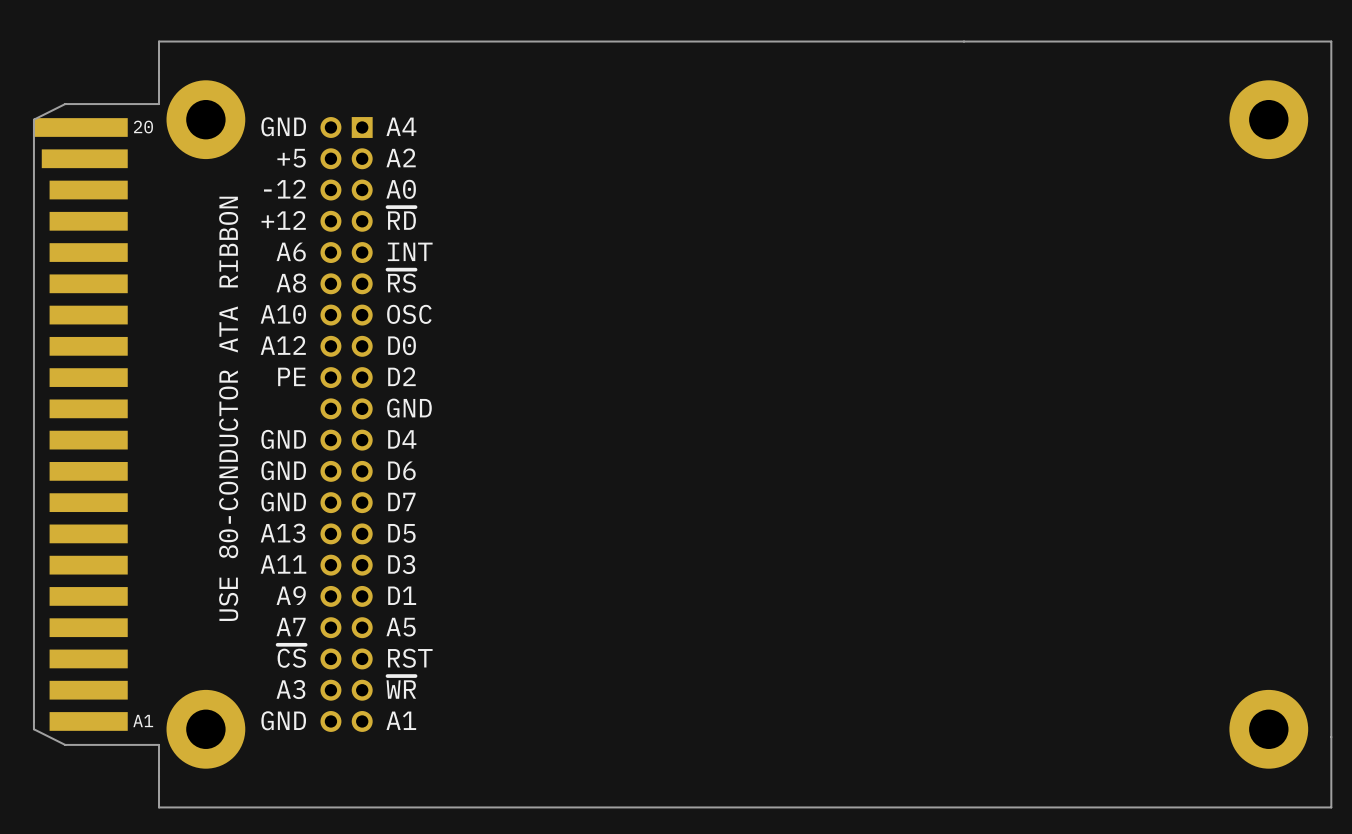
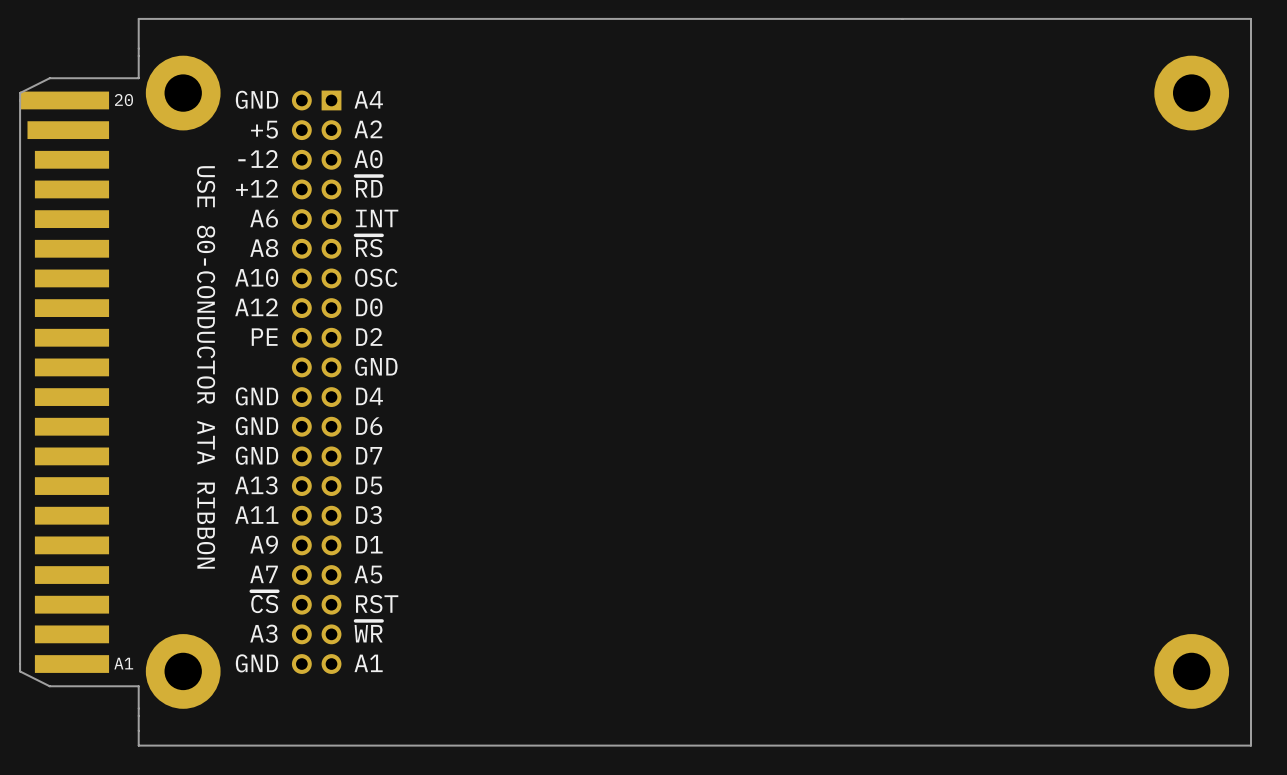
text rotation: 0° (228, 408) -> 180° (206, 367)

